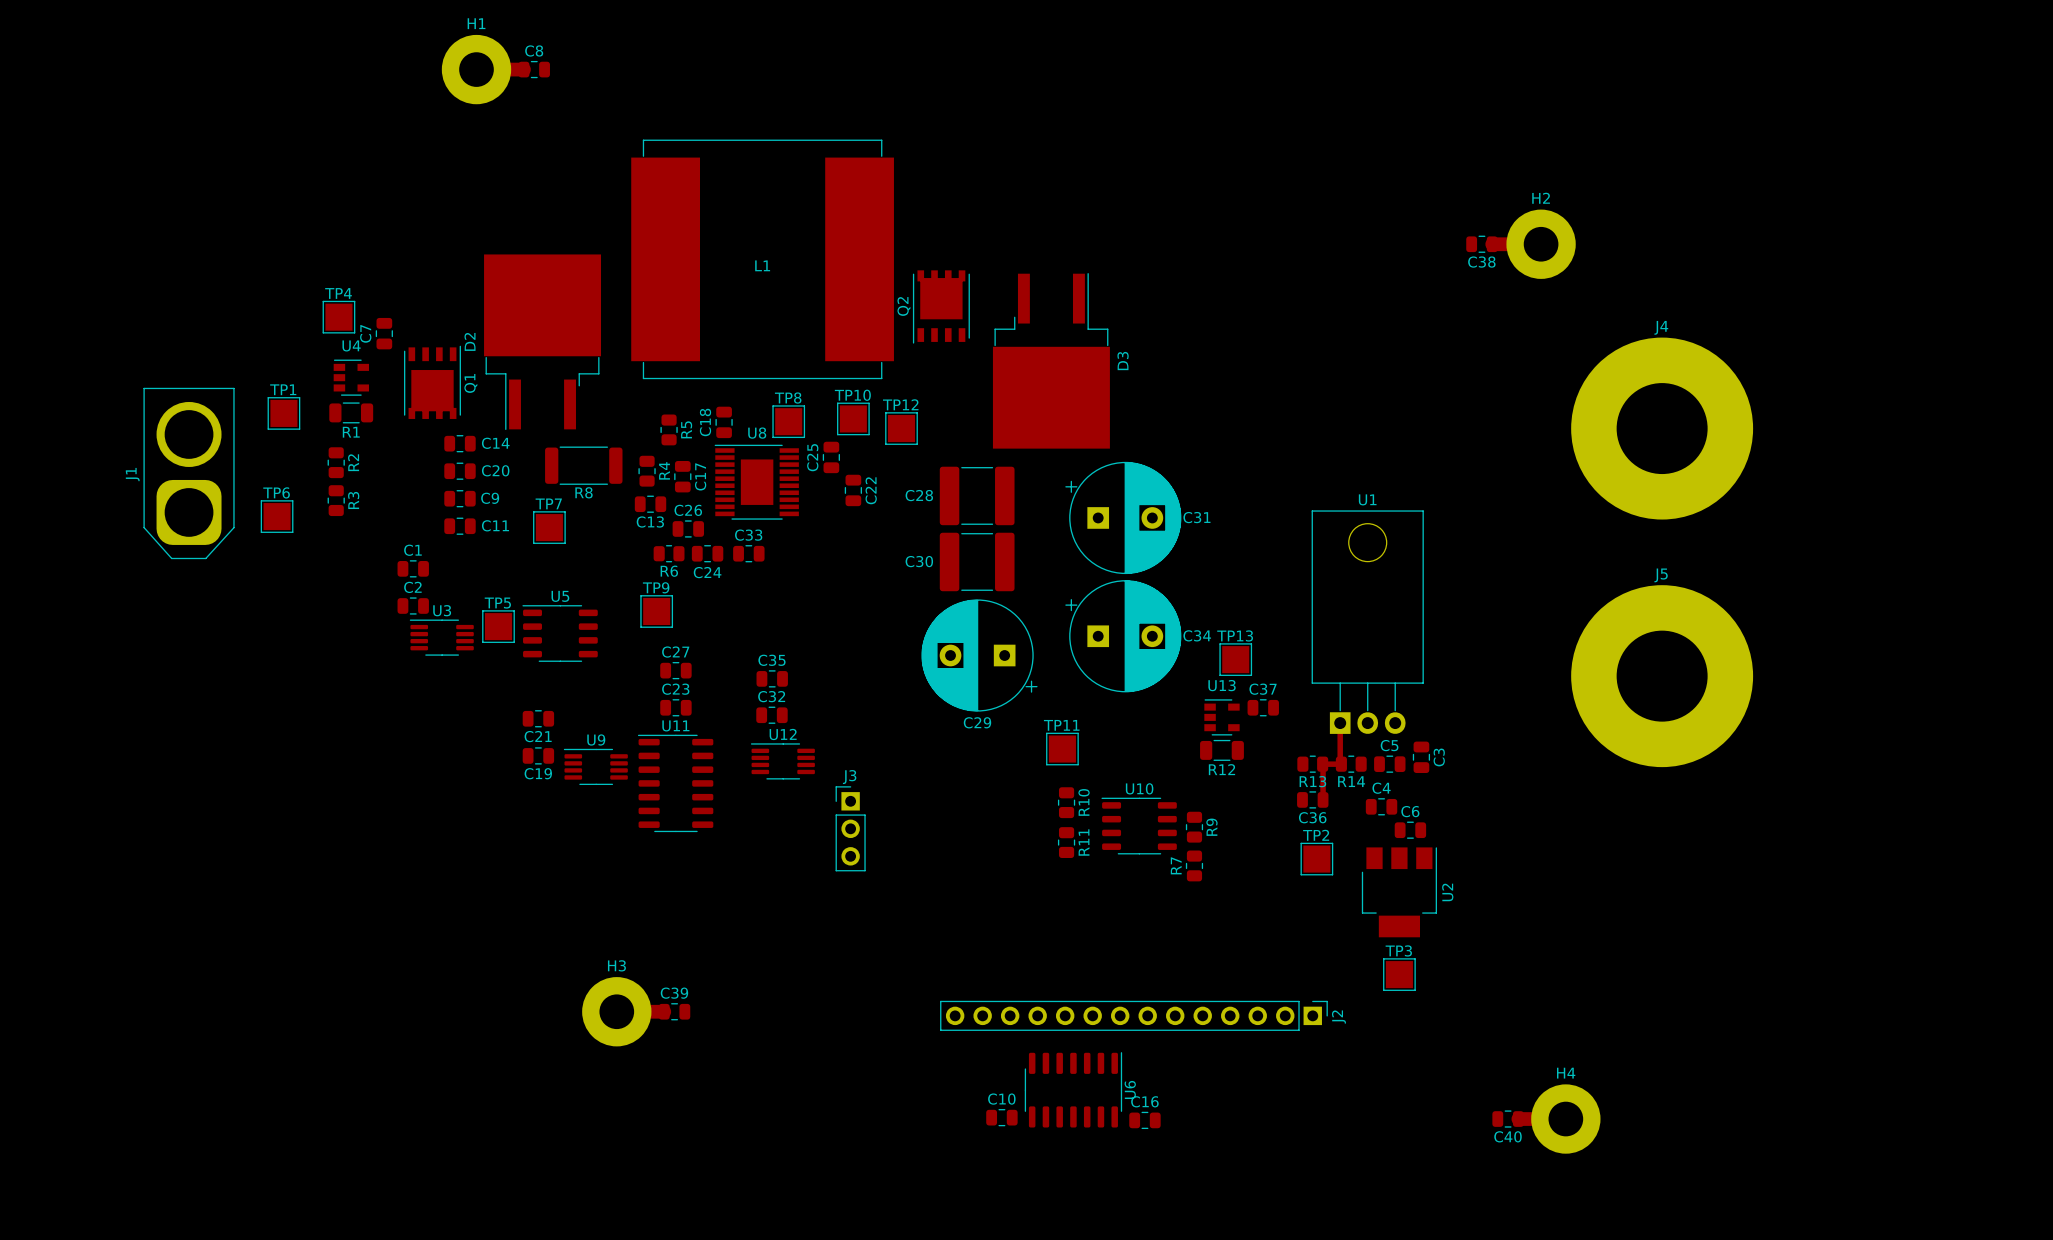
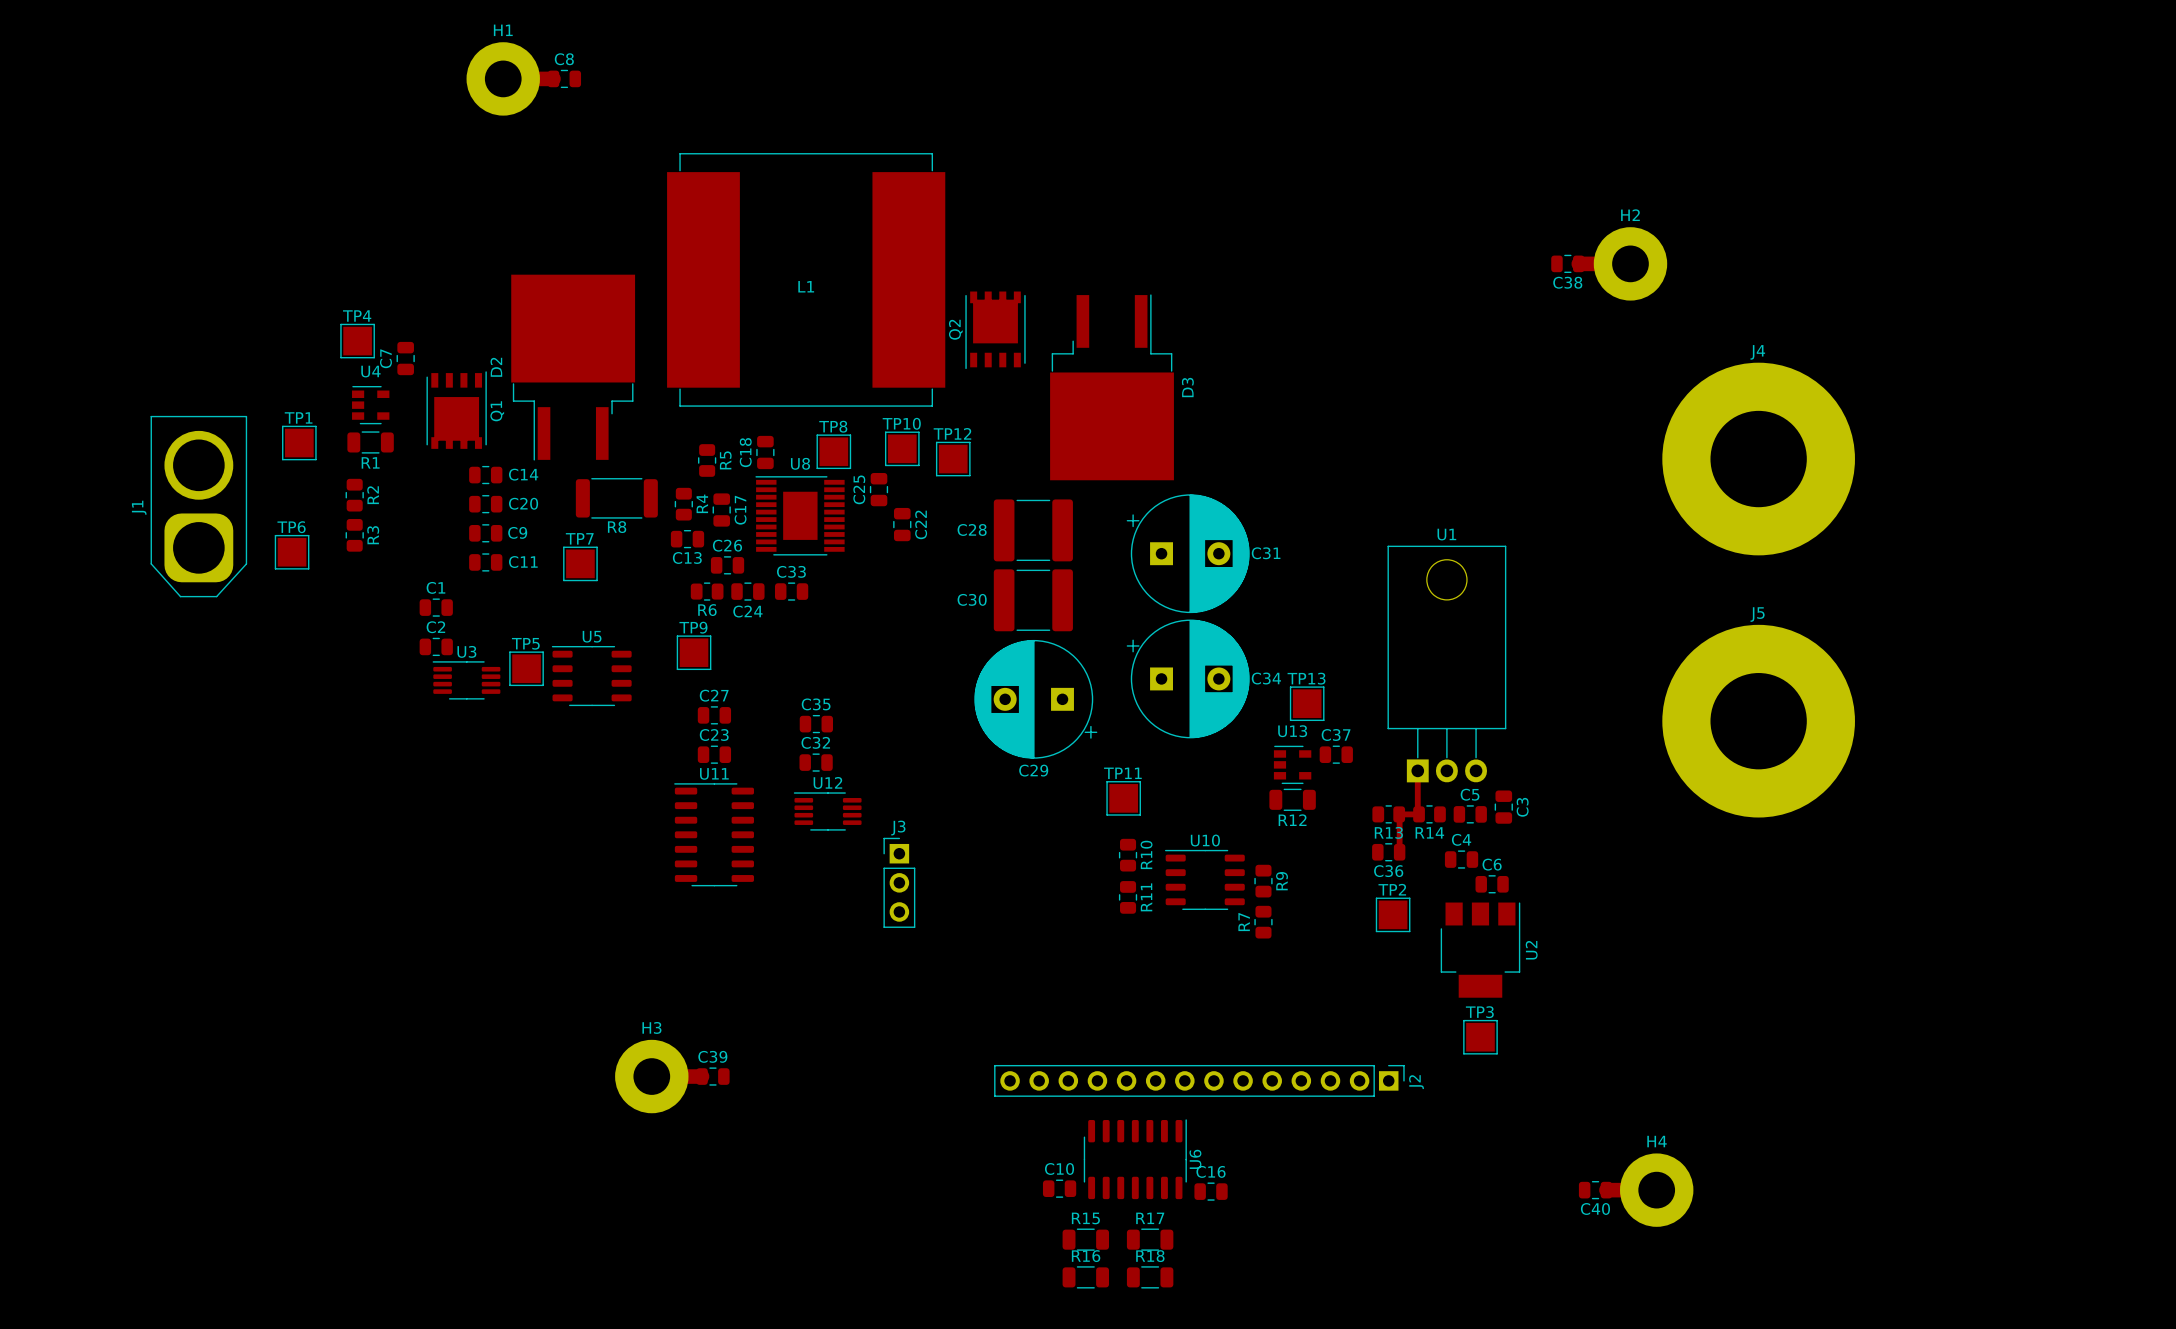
C21: (538, 718) -> none
C19: (538, 755) -> none
U9: (595, 766) -> none
R15: none -> (1085, 1239)
R17: none -> (1150, 1239)
R16: none -> (1085, 1277)
R18: none -> (1150, 1277)

